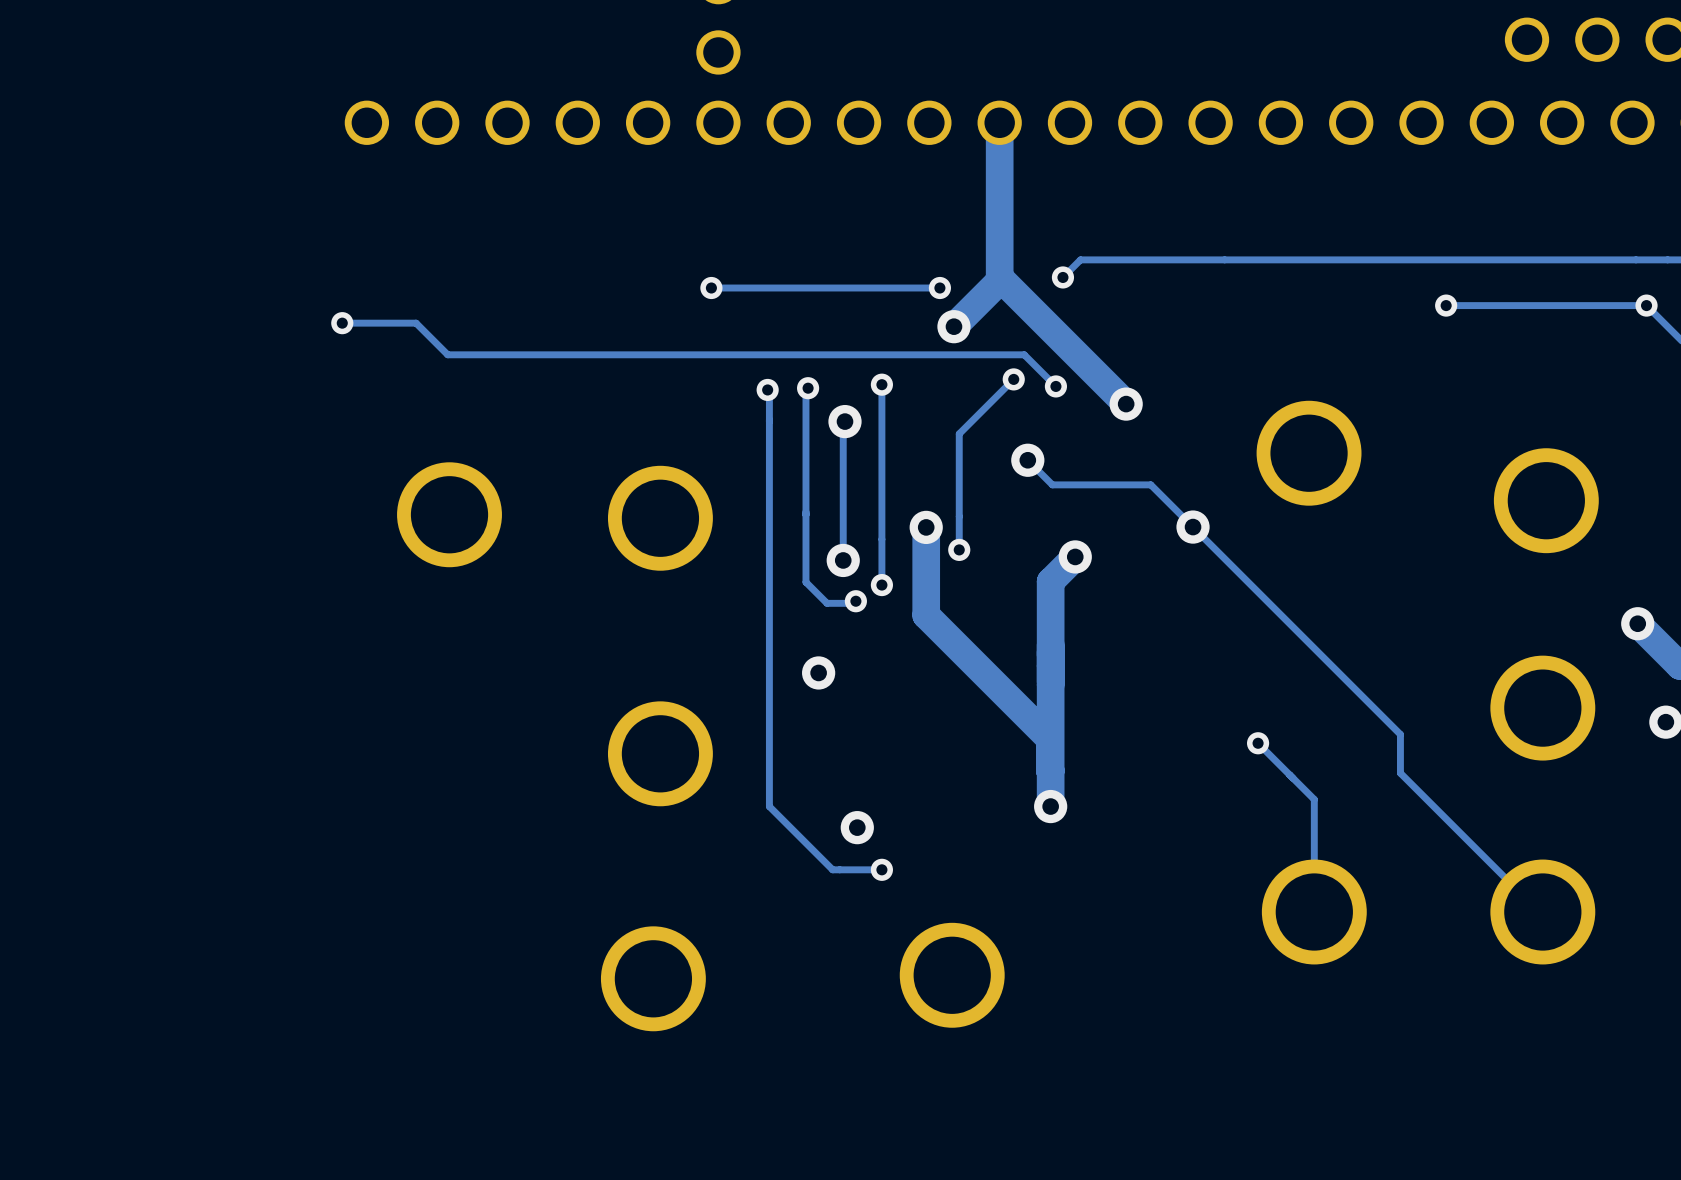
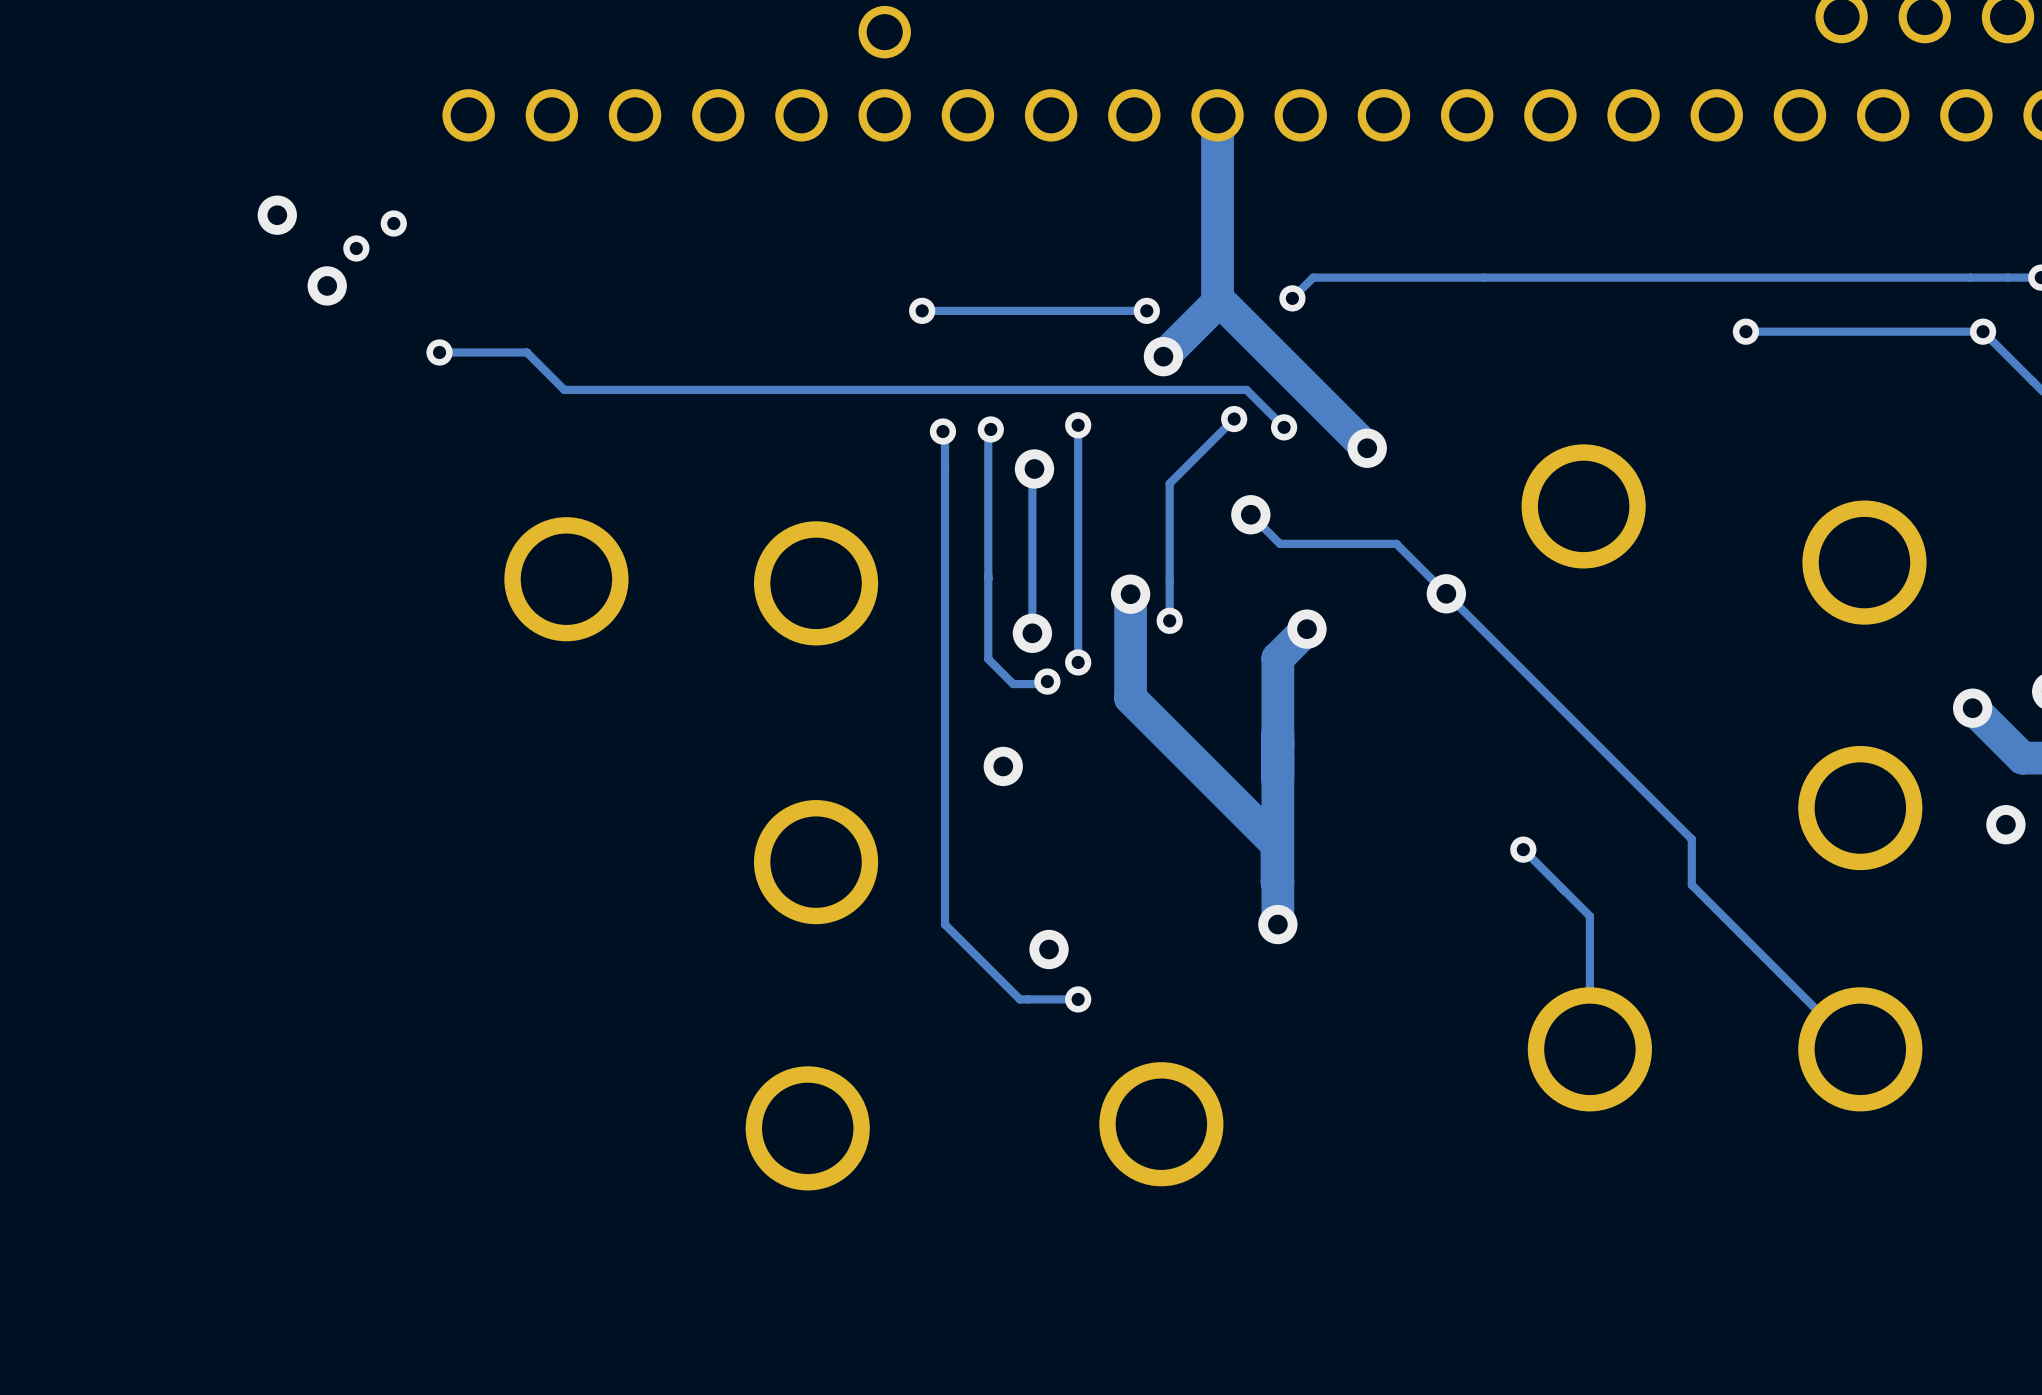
via: none -> (277, 215)
via: none -> (393, 223)
via: none -> (356, 248)
via: none -> (327, 285)
via position: (711, 288) -> (922, 310)
track: (750, 288) (711, 288) -> none

